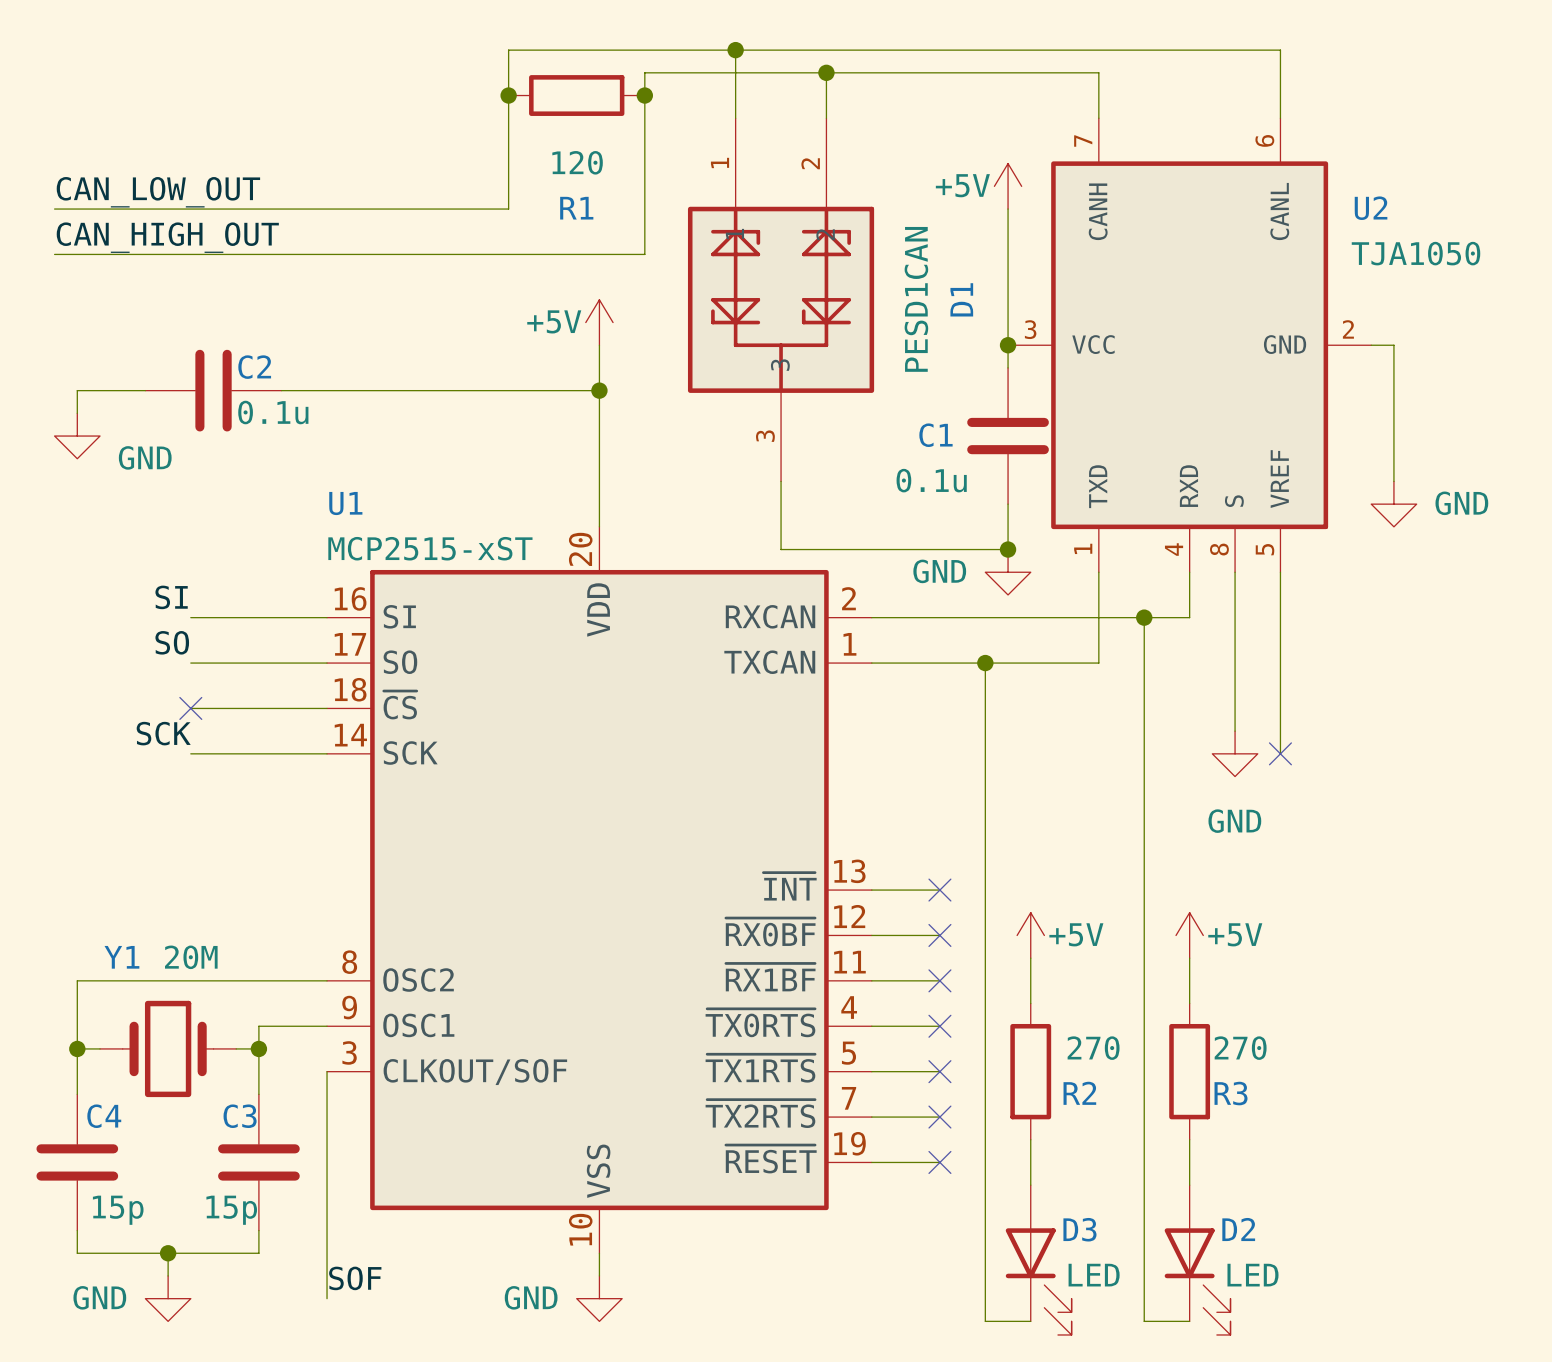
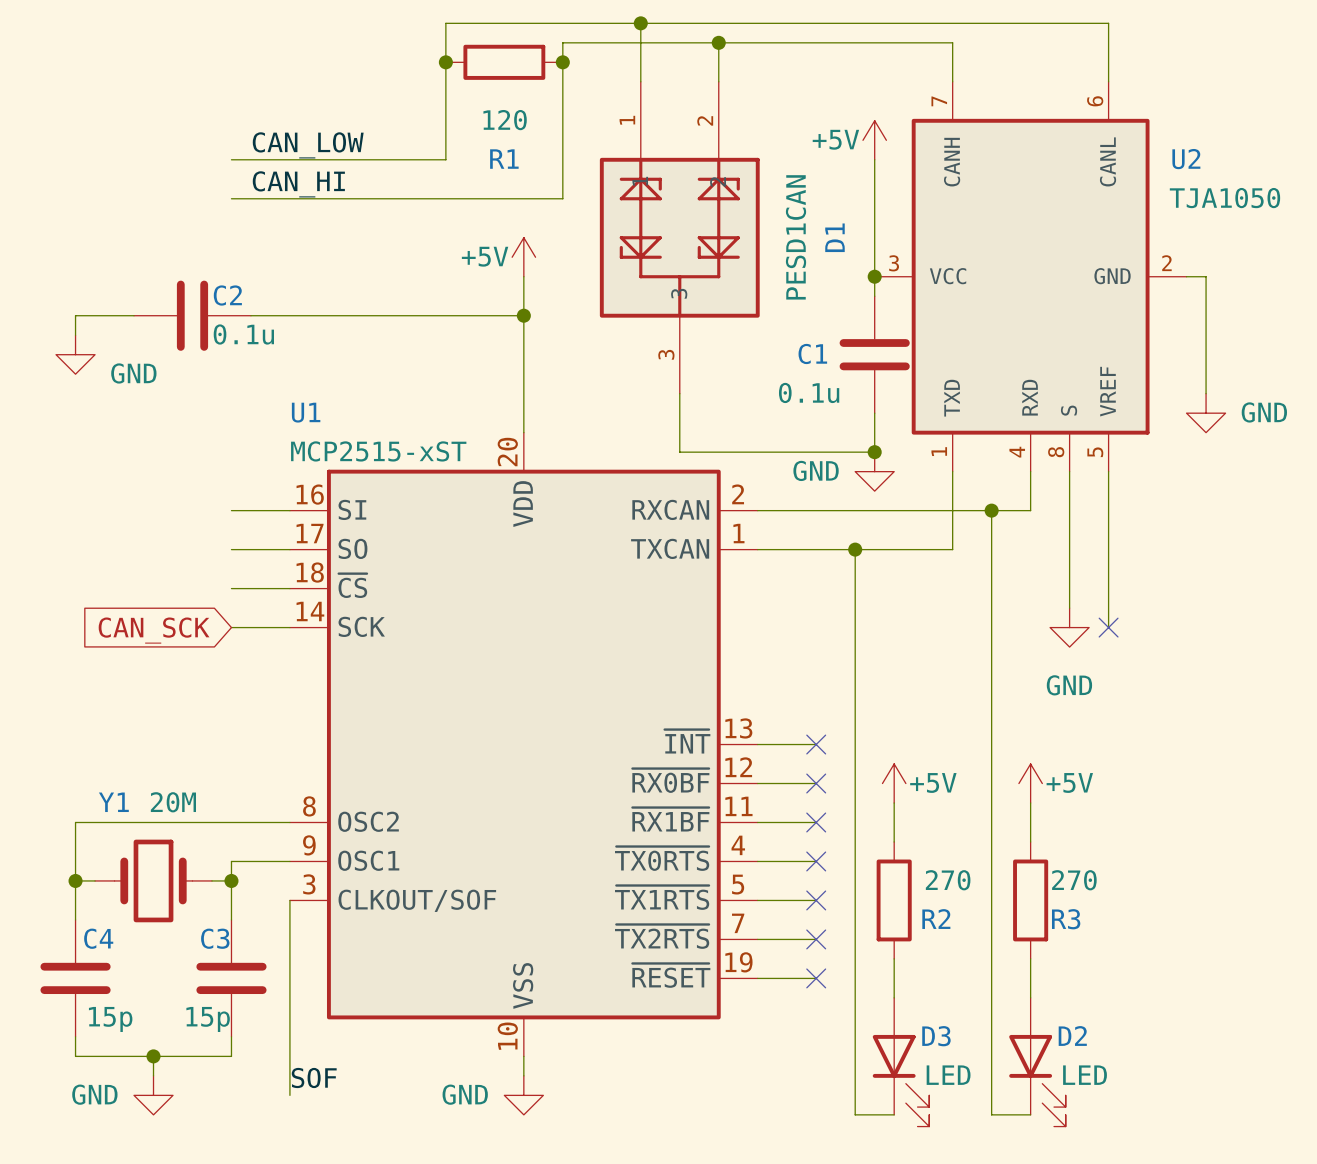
label: CAN_LOW_OUT (158, 192) -> CAN_LOW (308, 145)
wire: (54, 209) (258, 209) -> none
label: CAN_HIGH_OUT (167, 237) -> CAN_HI (298, 184)
wire: (54, 254) (258, 254) -> none
label: SI (171, 597) -> none
wire: (190, 617) (258, 617) -> none
label: SO (172, 642) -> none
wire: (190, 663) (258, 663) -> none
wire: (190, 708) (258, 708) -> none
no-connect mark: (190, 708) -> none
label: SCK (163, 733) -> none
wire: (190, 753) (258, 753) -> none
global label: none -> CAN_SCK (154, 630)

